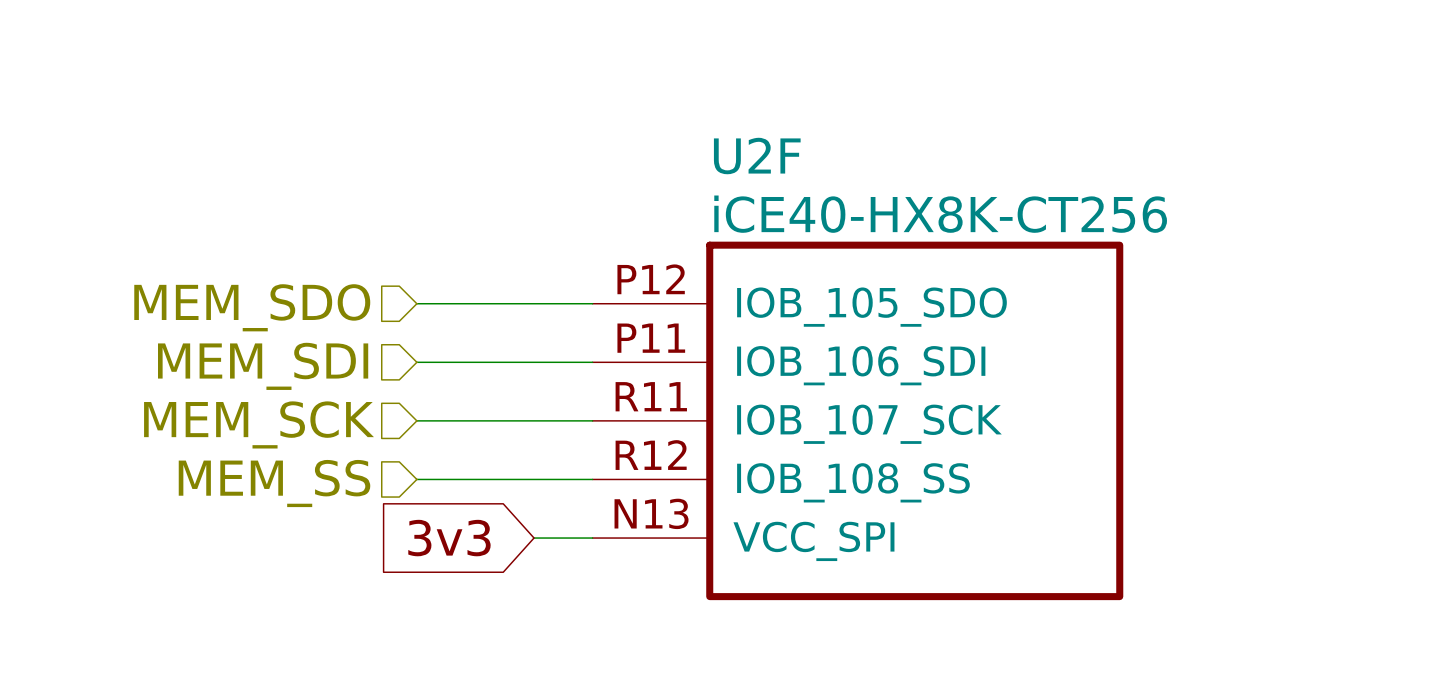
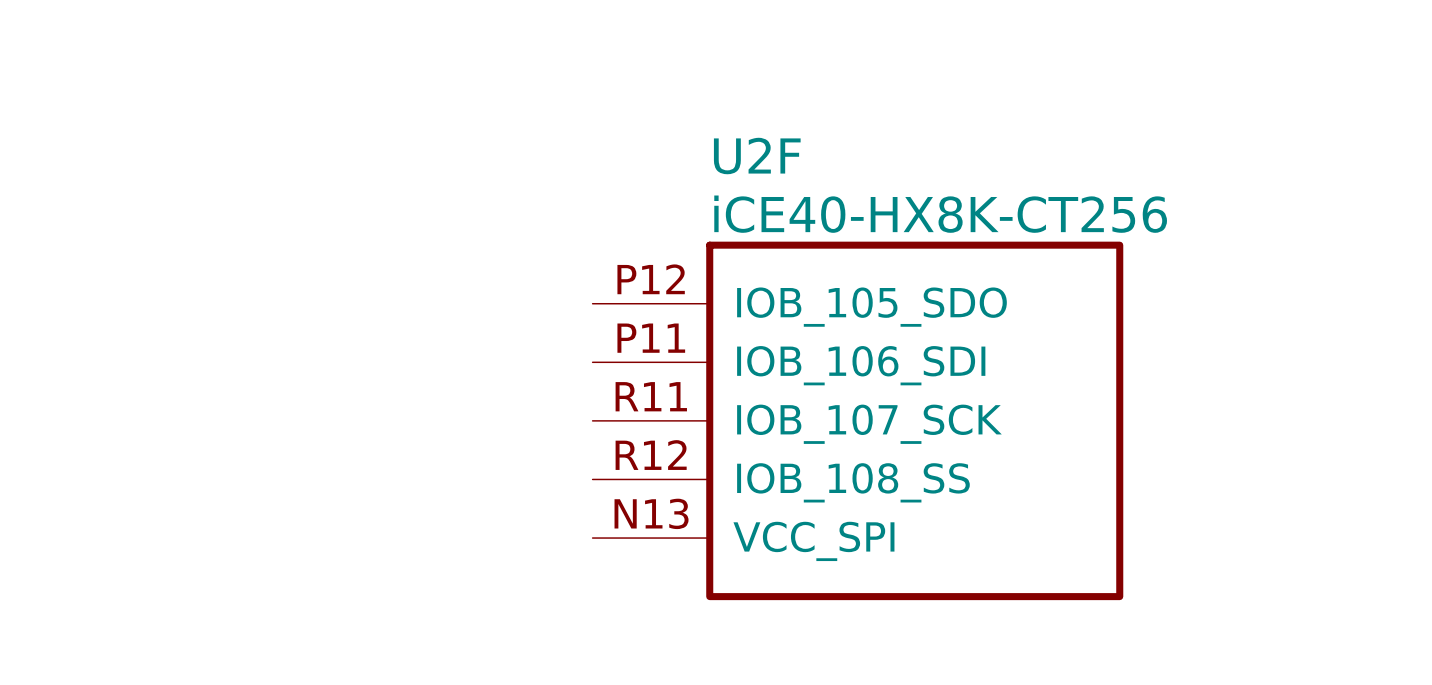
wire: (416, 303) (592, 303) -> none
hierarchical label: MEM_SDO (252, 307) -> none
wire: (416, 362) (592, 362) -> none
hierarchical label: MEM_SDI (263, 366) -> none
wire: (416, 420) (592, 420) -> none
hierarchical label: MEM_SCK (259, 424) -> none
wire: (416, 479) (592, 479) -> none
hierarchical label: MEM_SS (274, 483) -> none
global label: 3v3 (449, 538) -> none
wire: (534, 538) (592, 538) -> none

